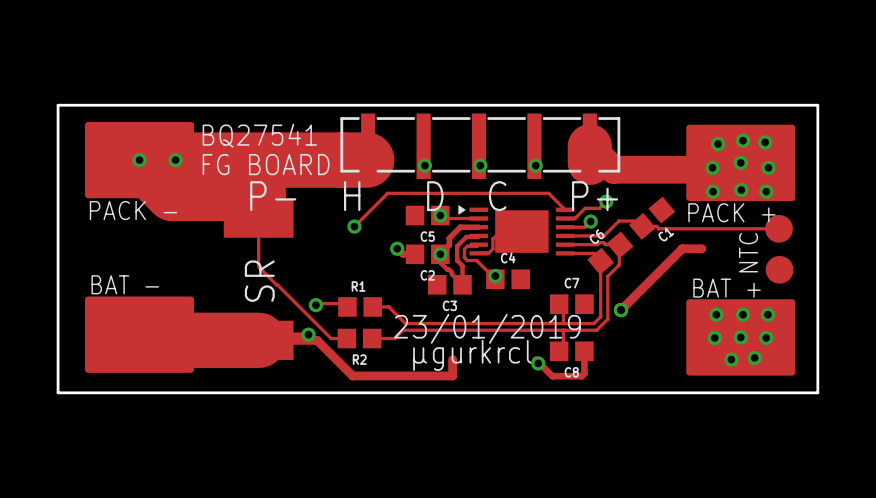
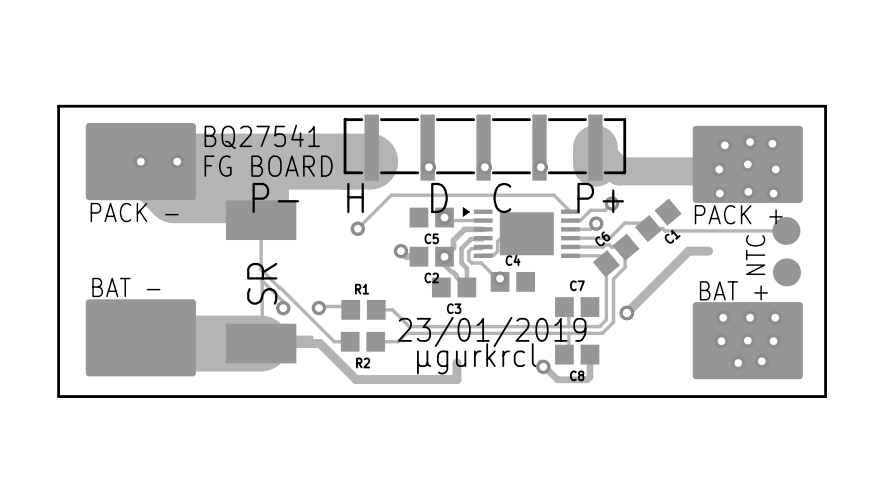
track: none -> (279, 304) (283, 308) (283, 301) (262, 280) (261, 343)
via position: (308, 334) -> (283, 308)

